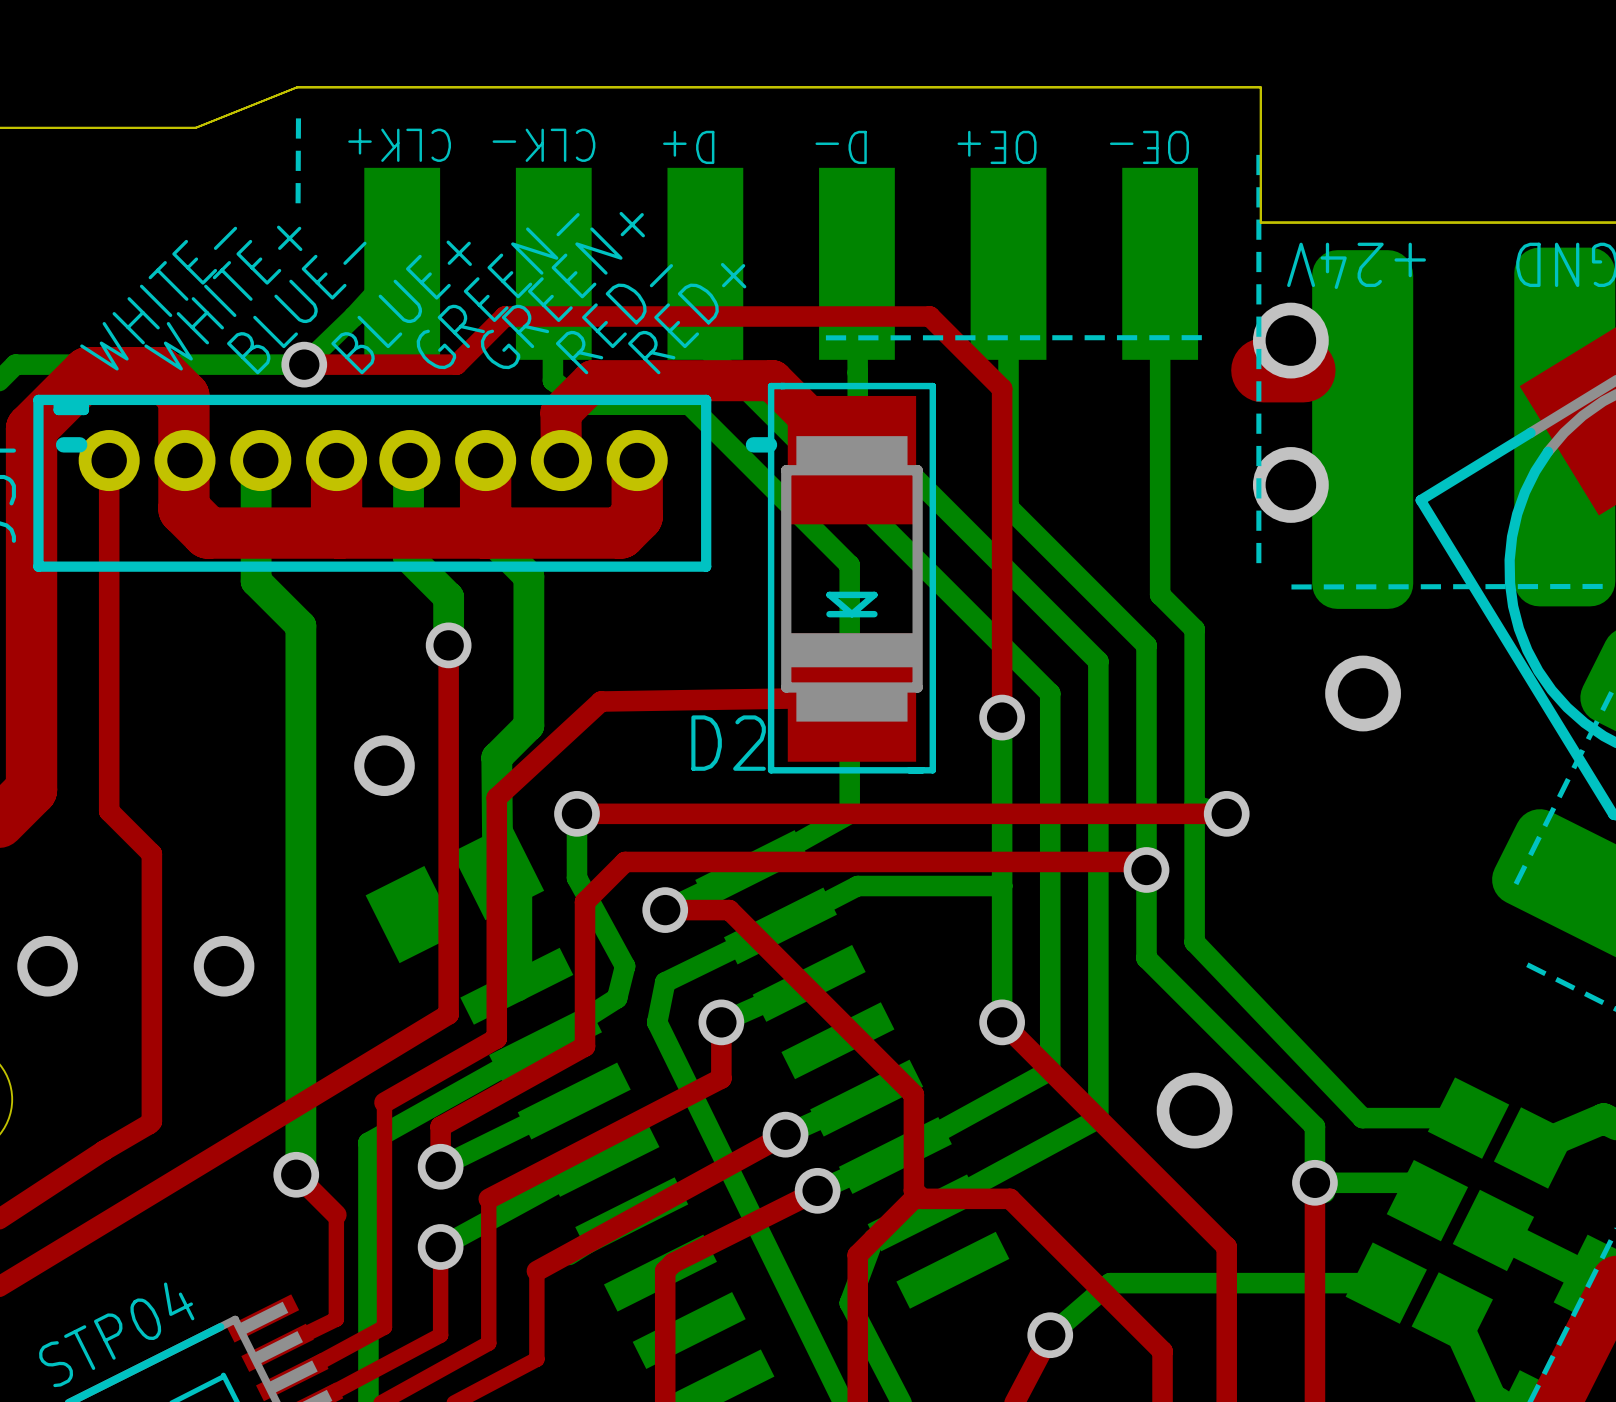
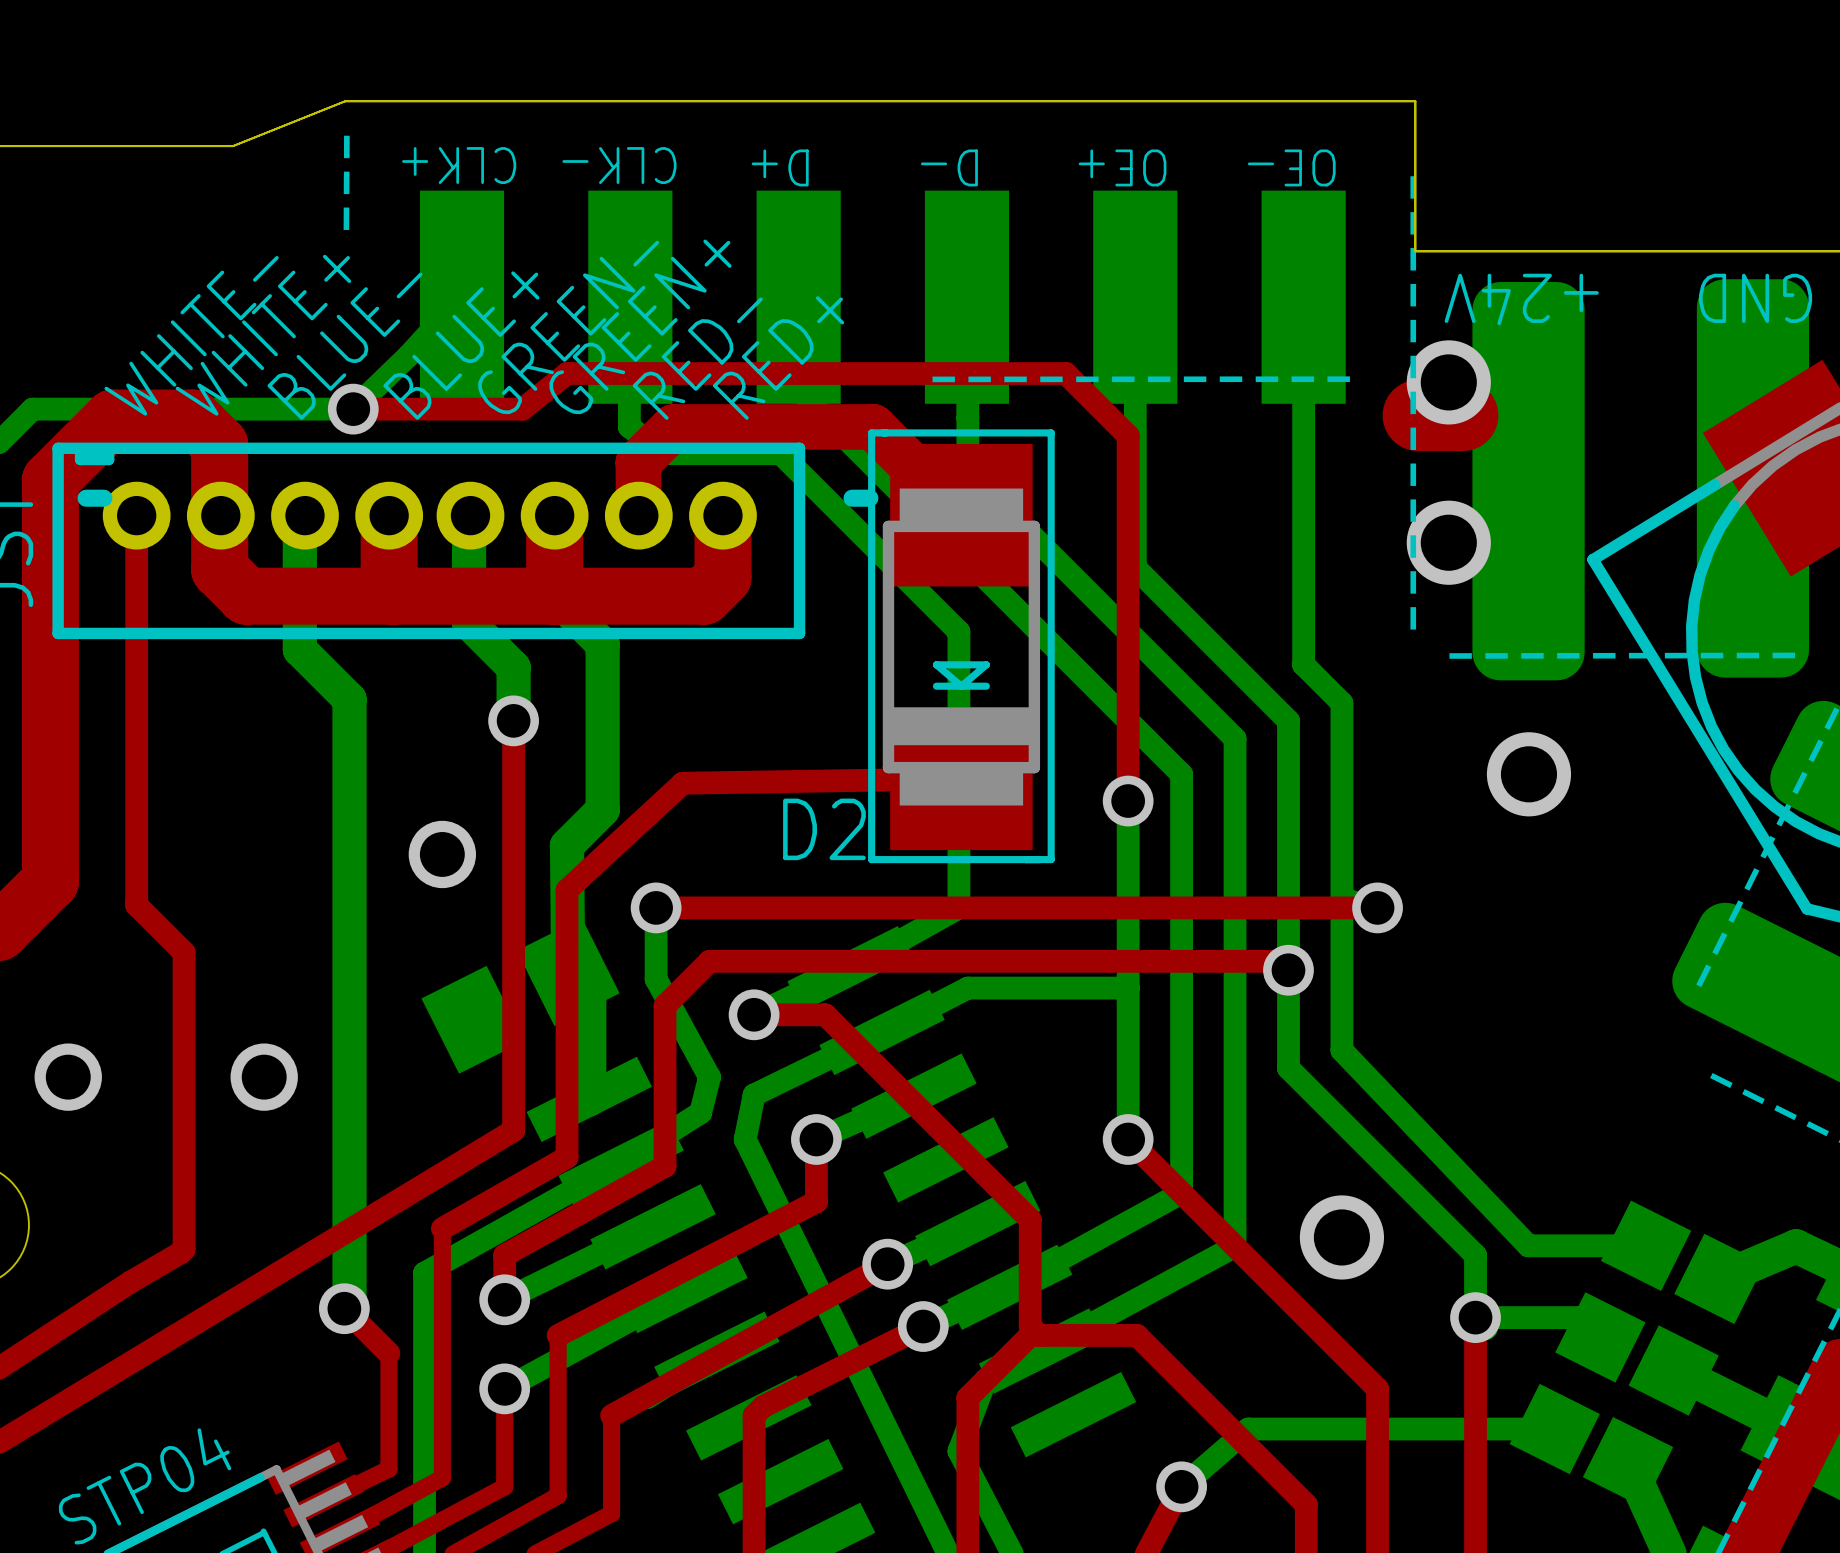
top track: (945, 332) (929, 316) (504, 316) (456, 364) -> (1065, 373) (567, 373) (522, 409)

